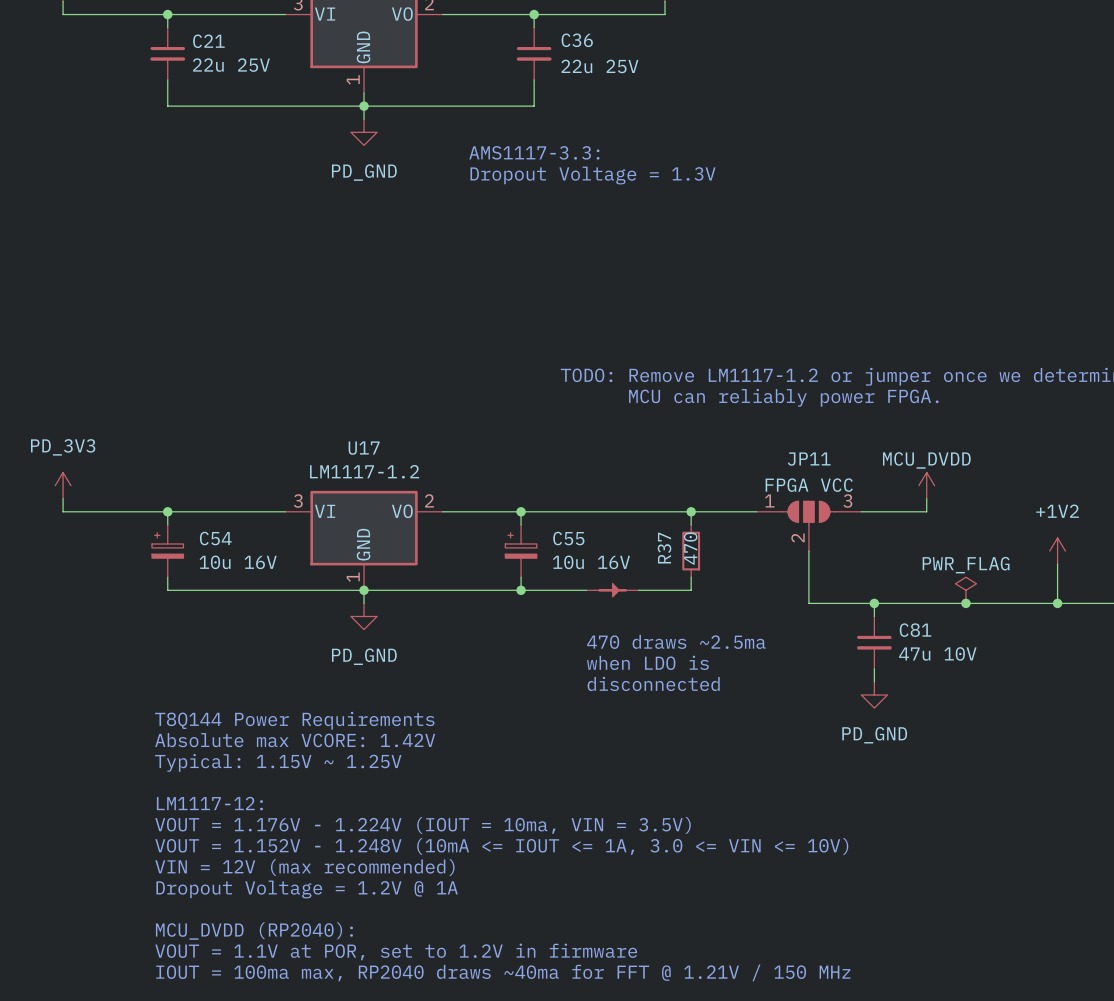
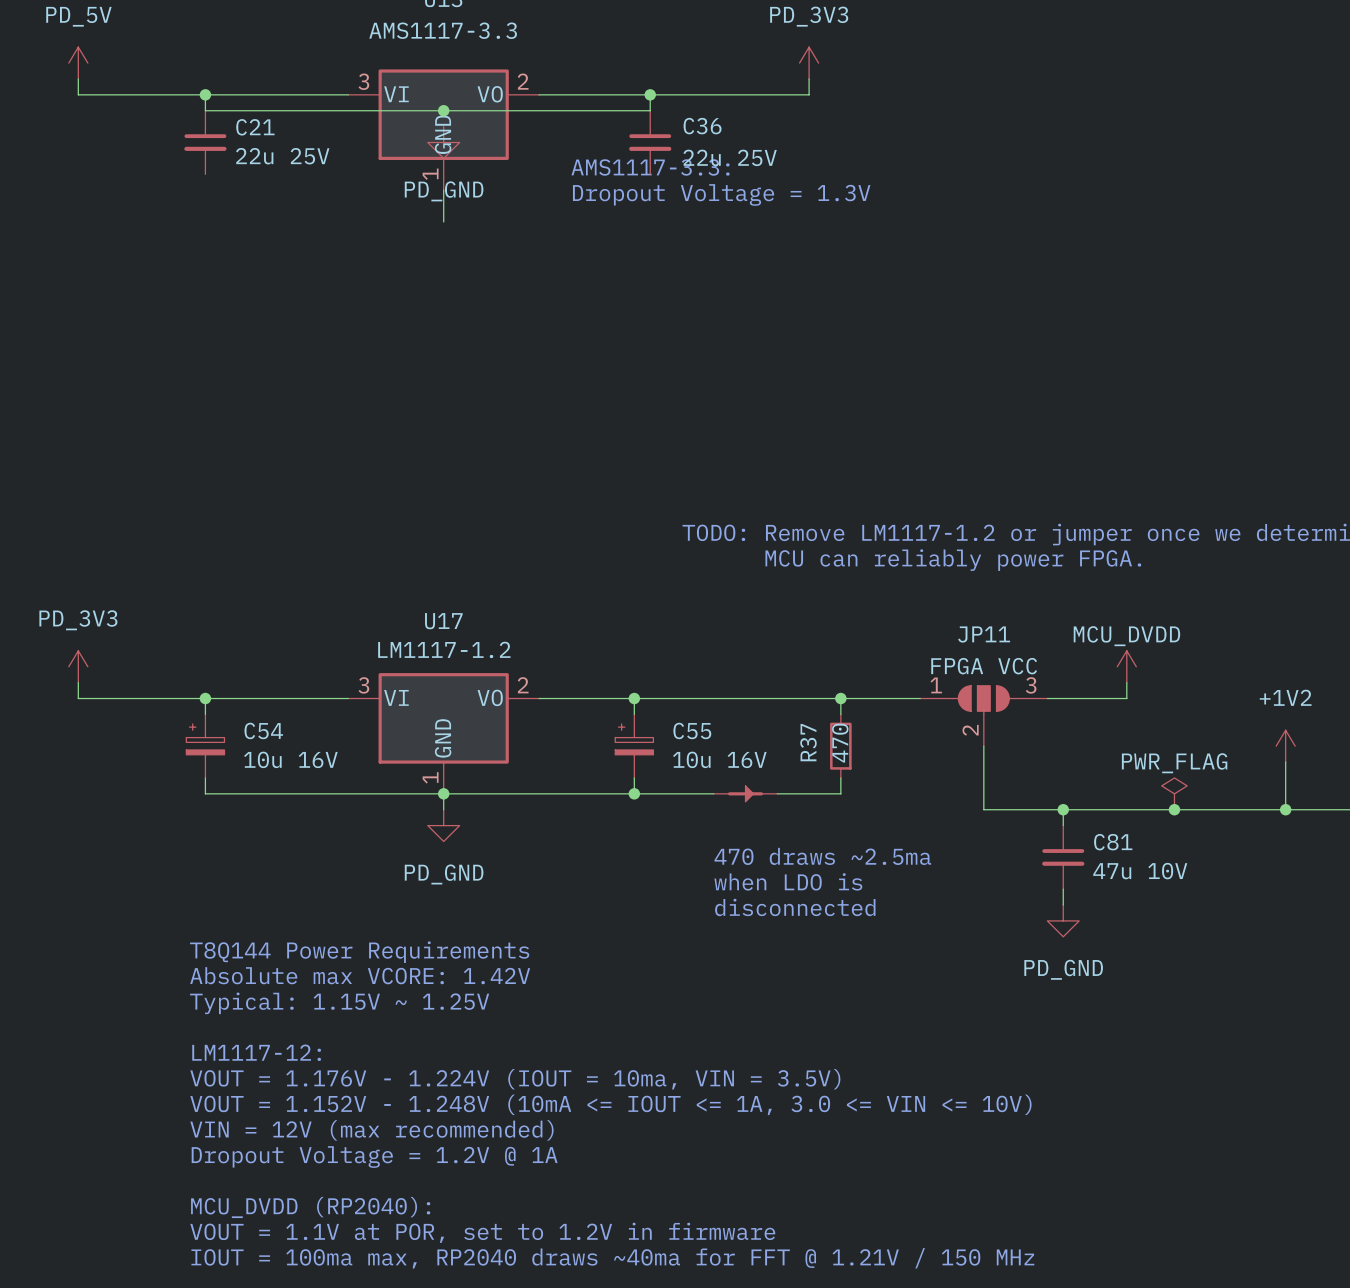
wire: none -> (205, 110) (650, 110)
junction: none -> (443, 110)
wire: (167, 79) (167, 106) (534, 106) (534, 79) -> none
junction: (364, 106) -> none
power symbol position: PD_GND (364, 132) -> PD_GND (443, 142)
text position: AMS1117-3.3: (534, 152) -> AMS1117-3.3: (650, 167)
text position: Dropout Voltage = 1.3V (593, 175) -> Dropout Voltage = 1.3V (721, 194)

